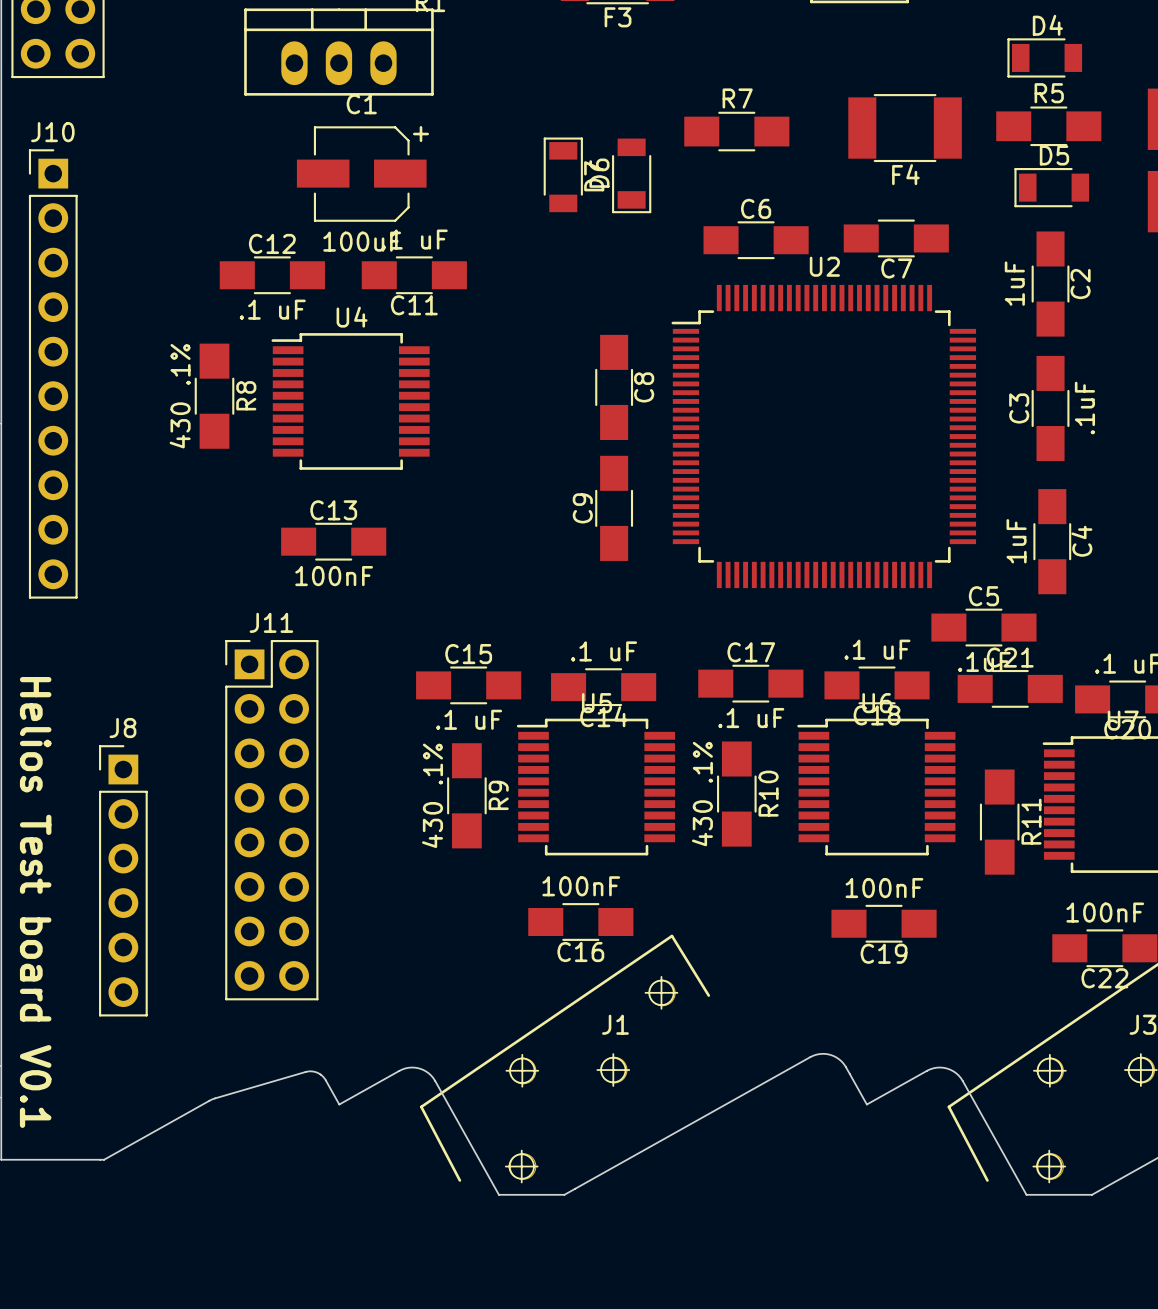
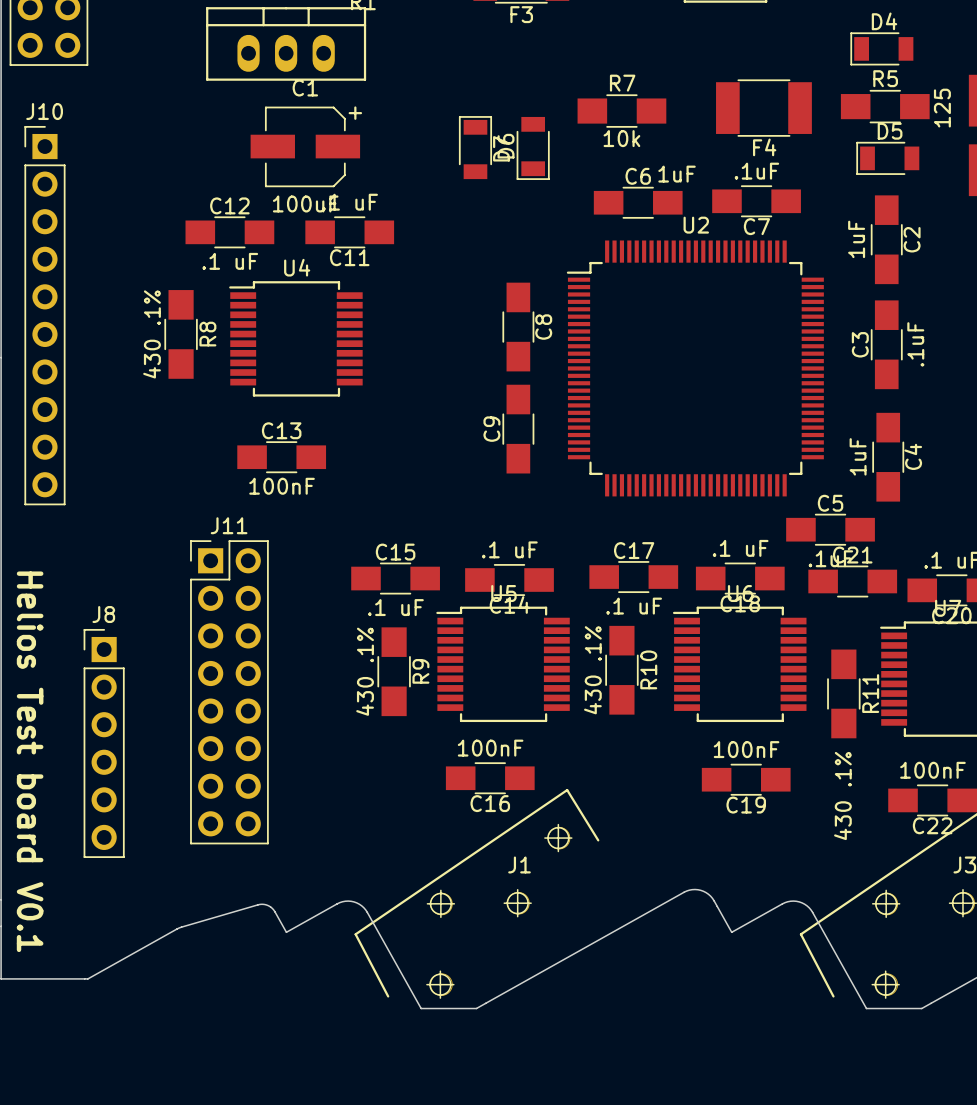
R5 value: none -> 125 (942, 108)
R7 value: none -> 10k (621, 138)
C7 value: none -> .1uF (756, 171)
C6 value: none -> 1uF (677, 174)
R11 value: none -> 430 .1% (842, 796)

